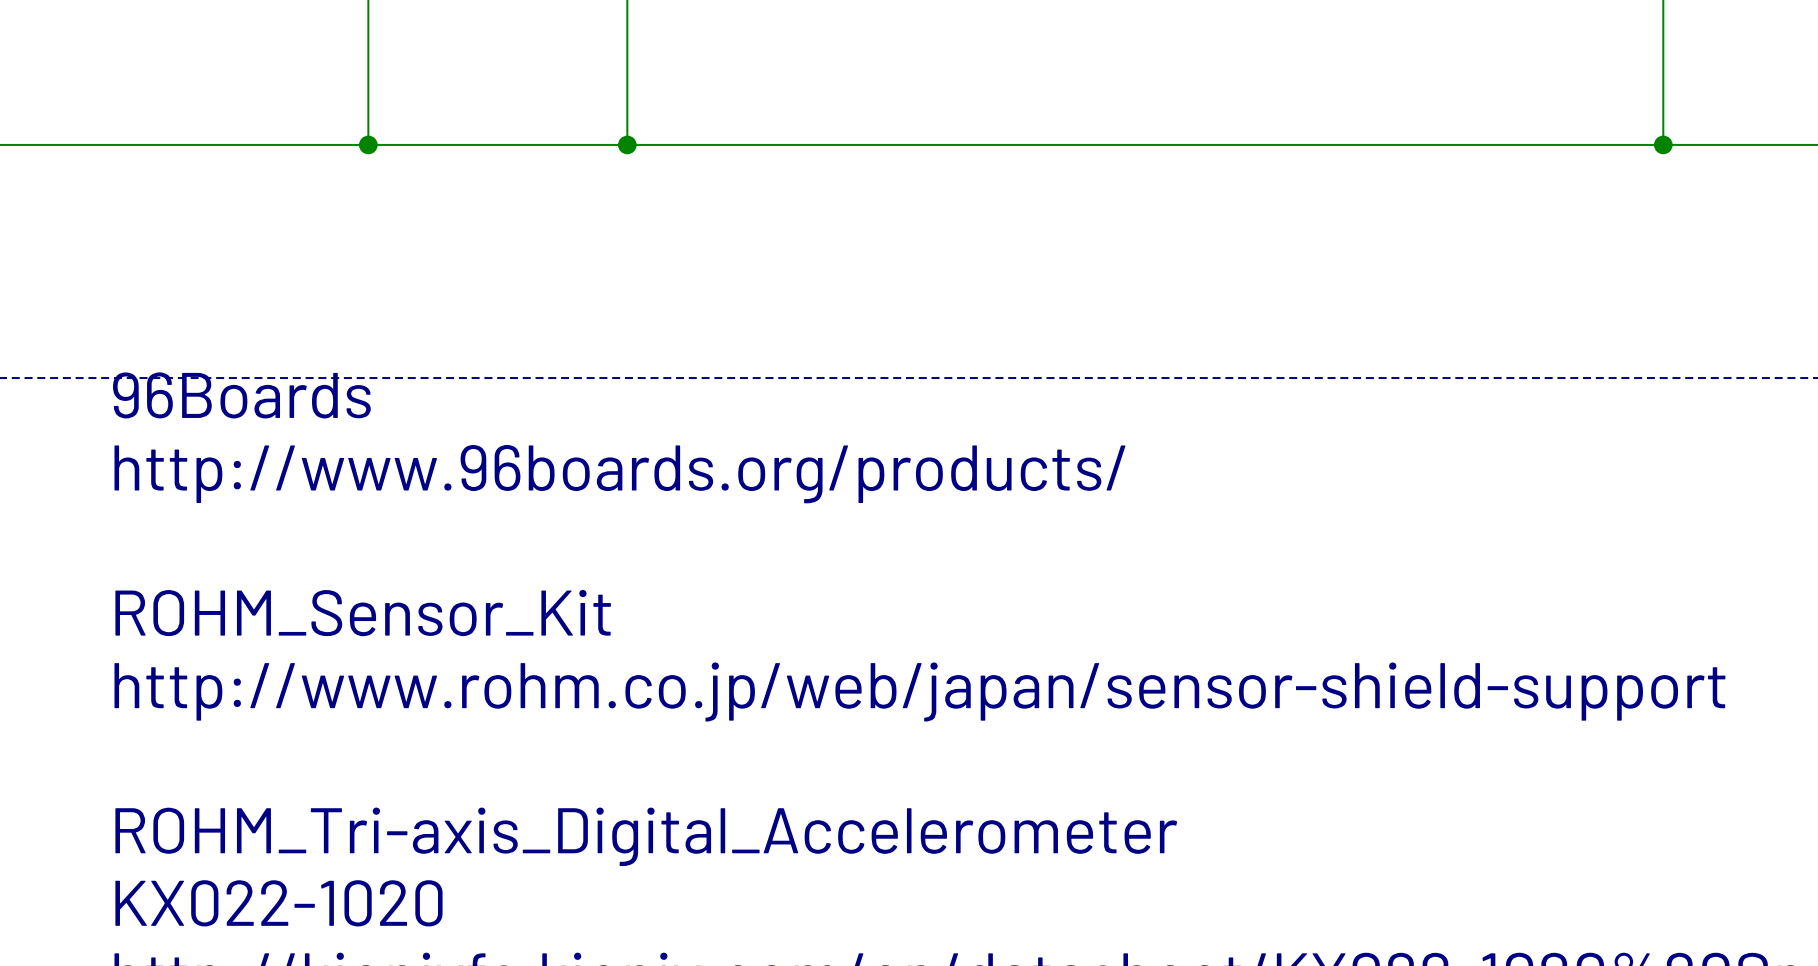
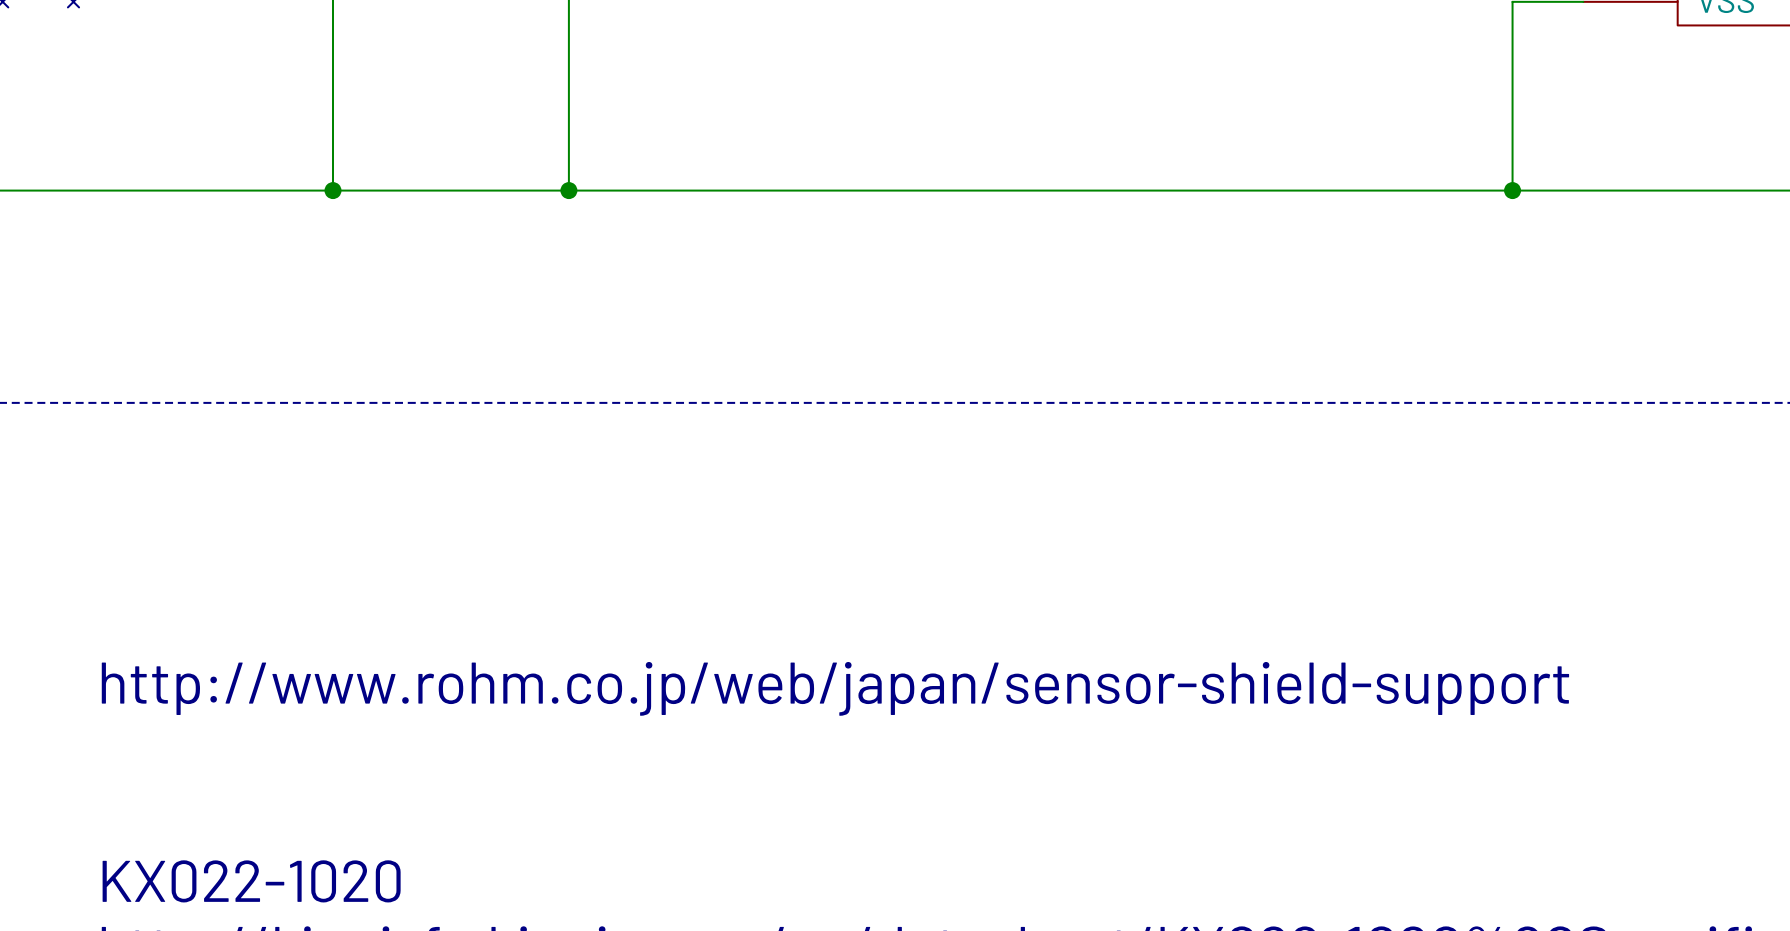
text: 96Boards (241, 395) -> none
text: http://www.96boards.org/products/ (620, 474) -> none
text: ROHM_Sensor_Kit (363, 613) -> none
text: ROHM_Tri-axis_Digital_Accelerometer (646, 836) -> none

